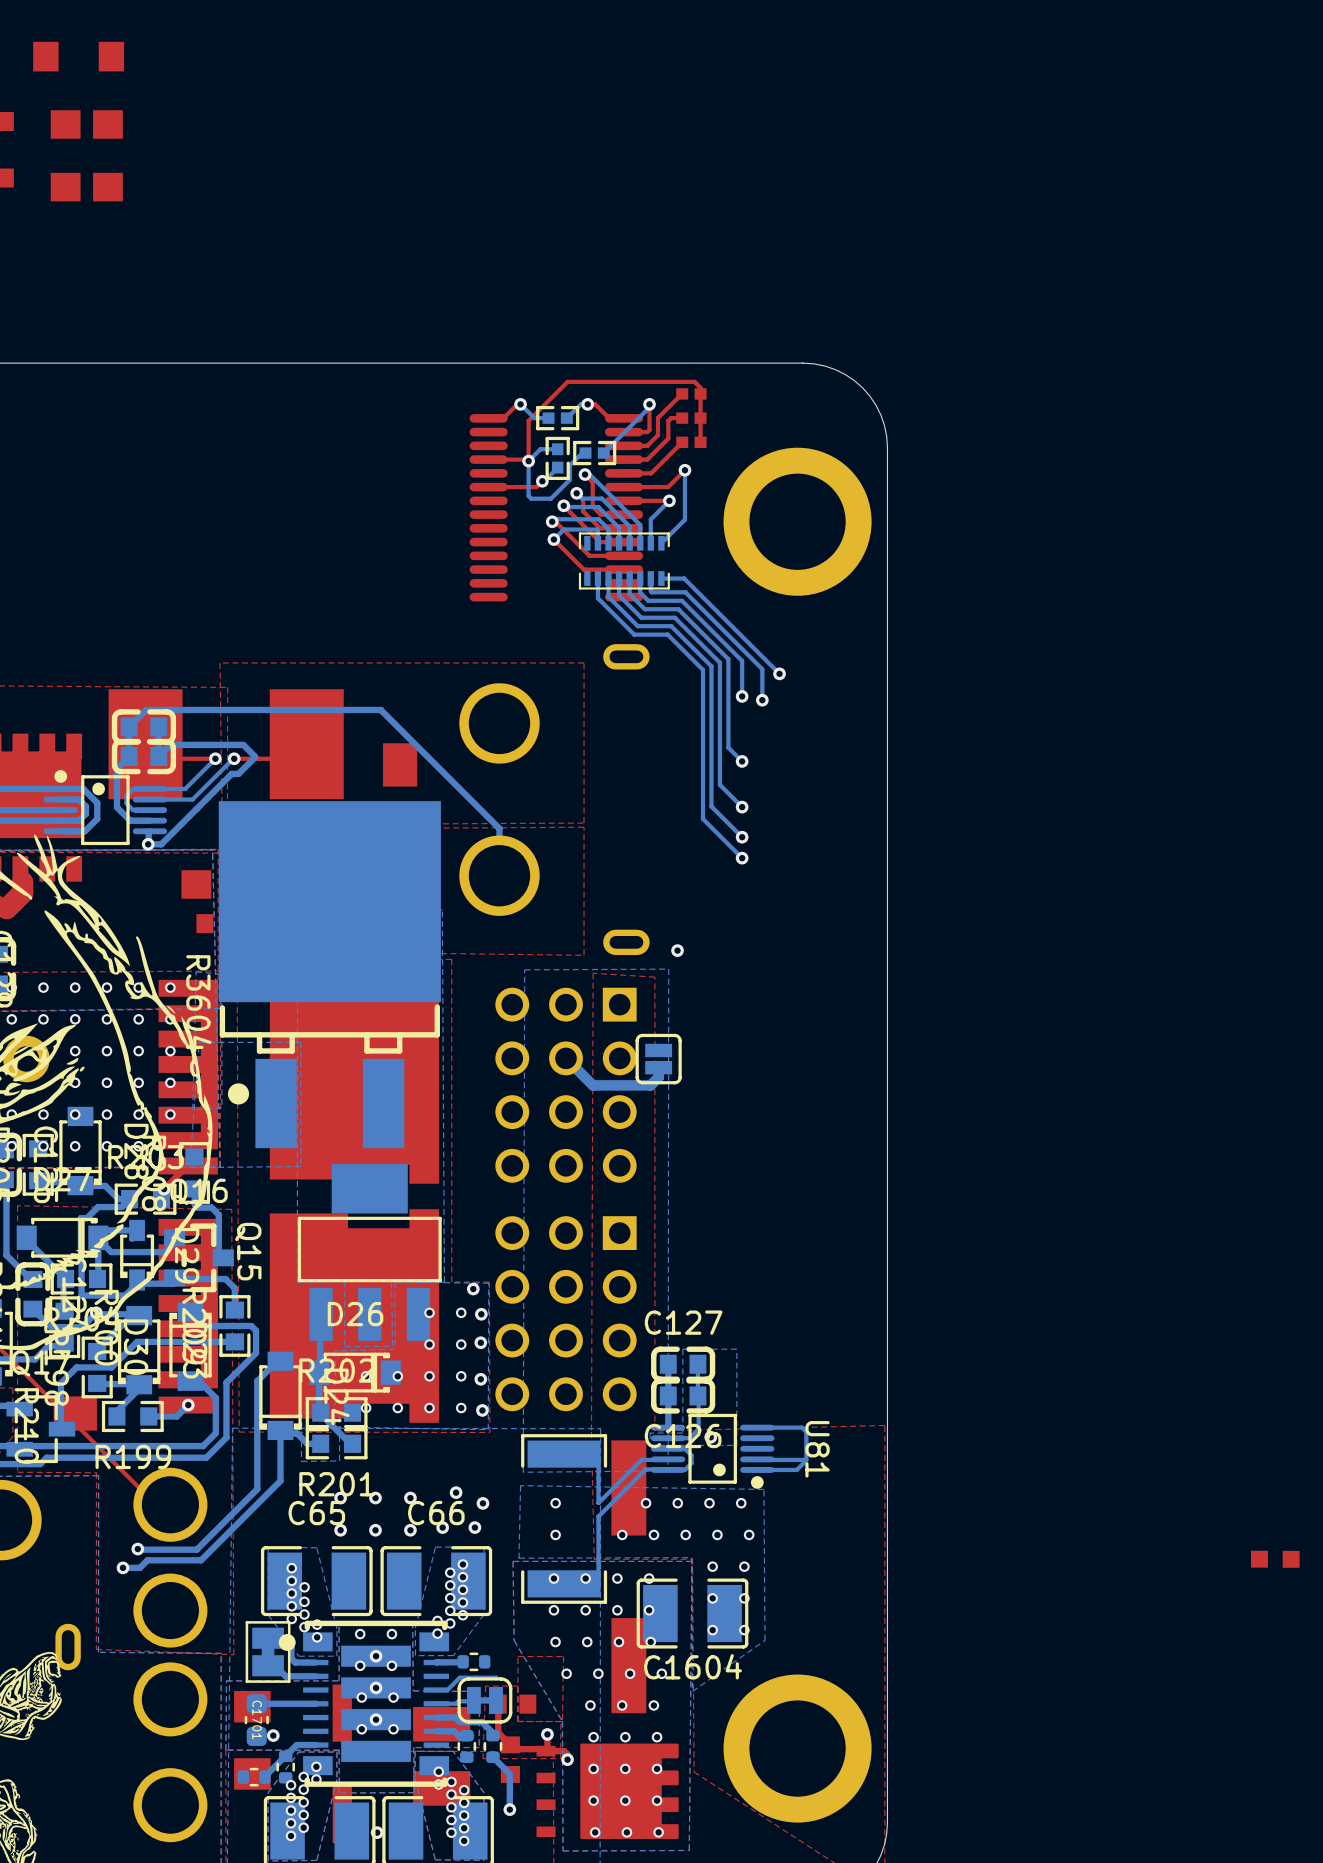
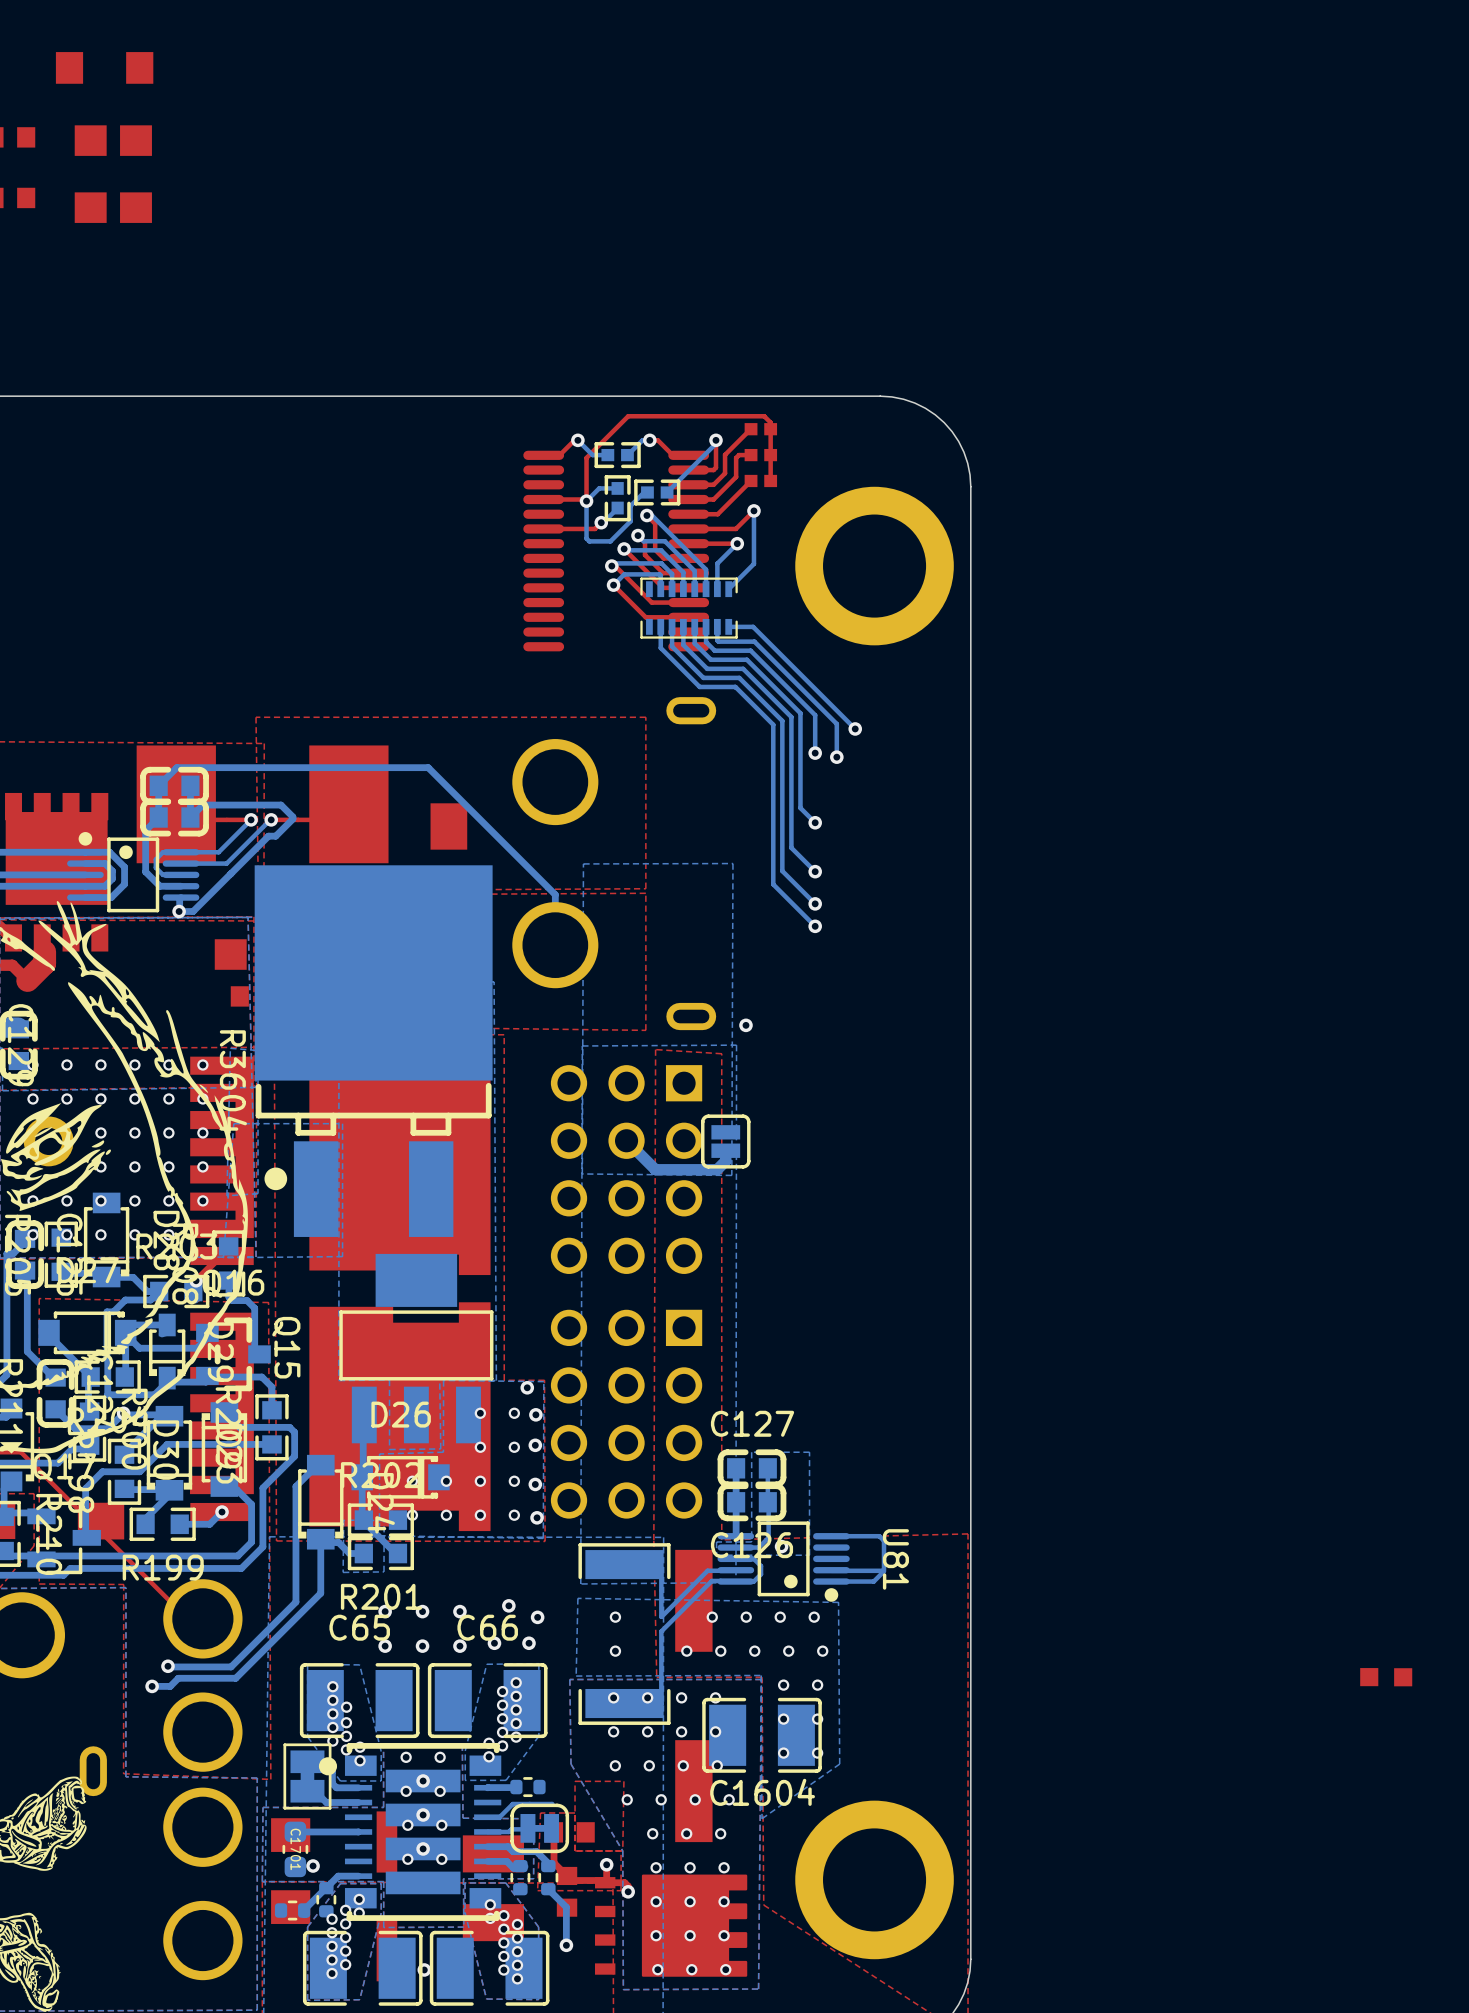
bottom zone outline: none -> (732, 863) (731, 1175) (582, 1173) (583, 863) (732, 863)

